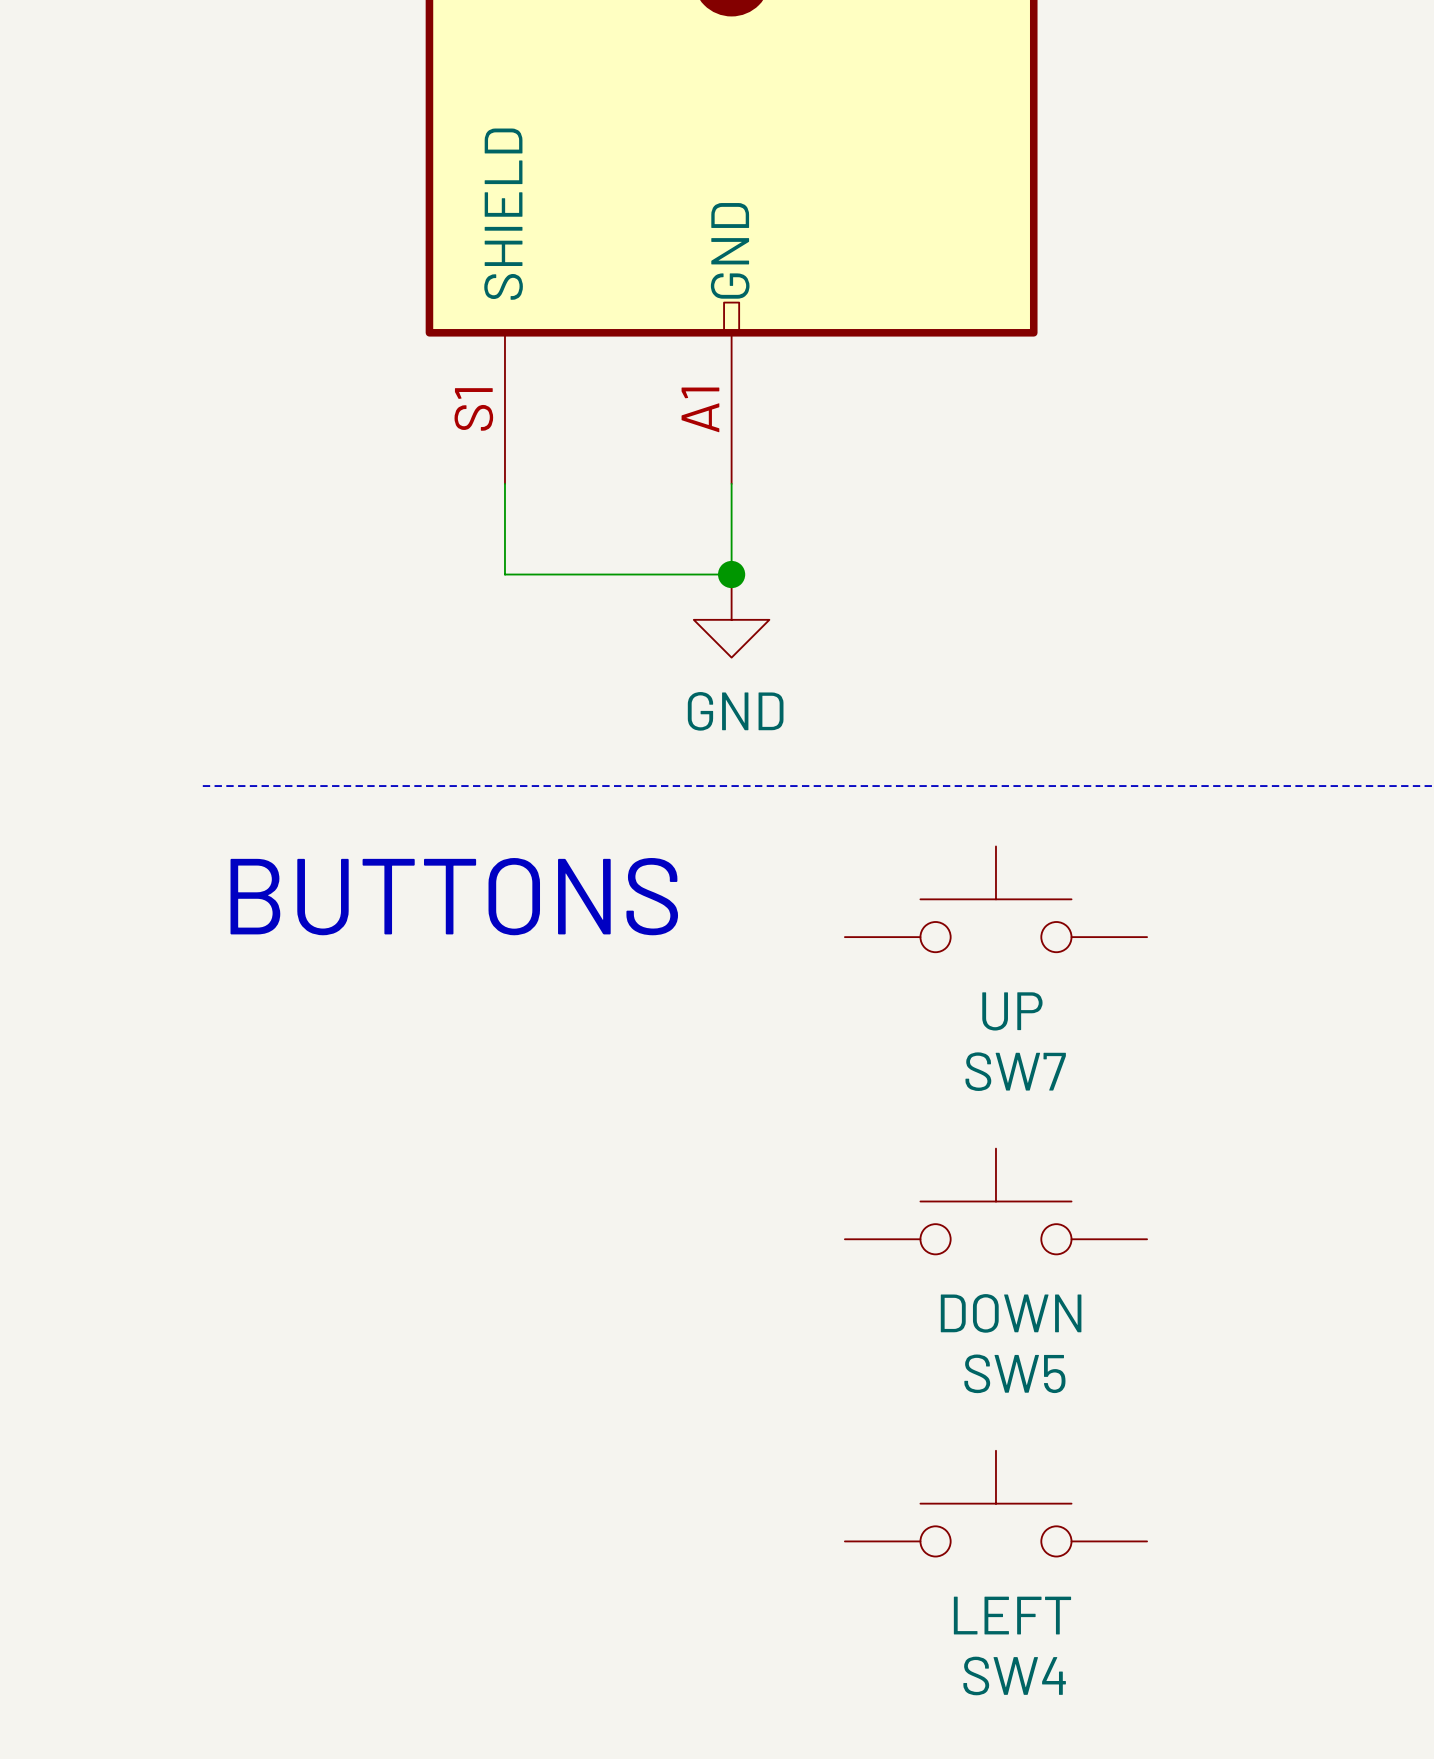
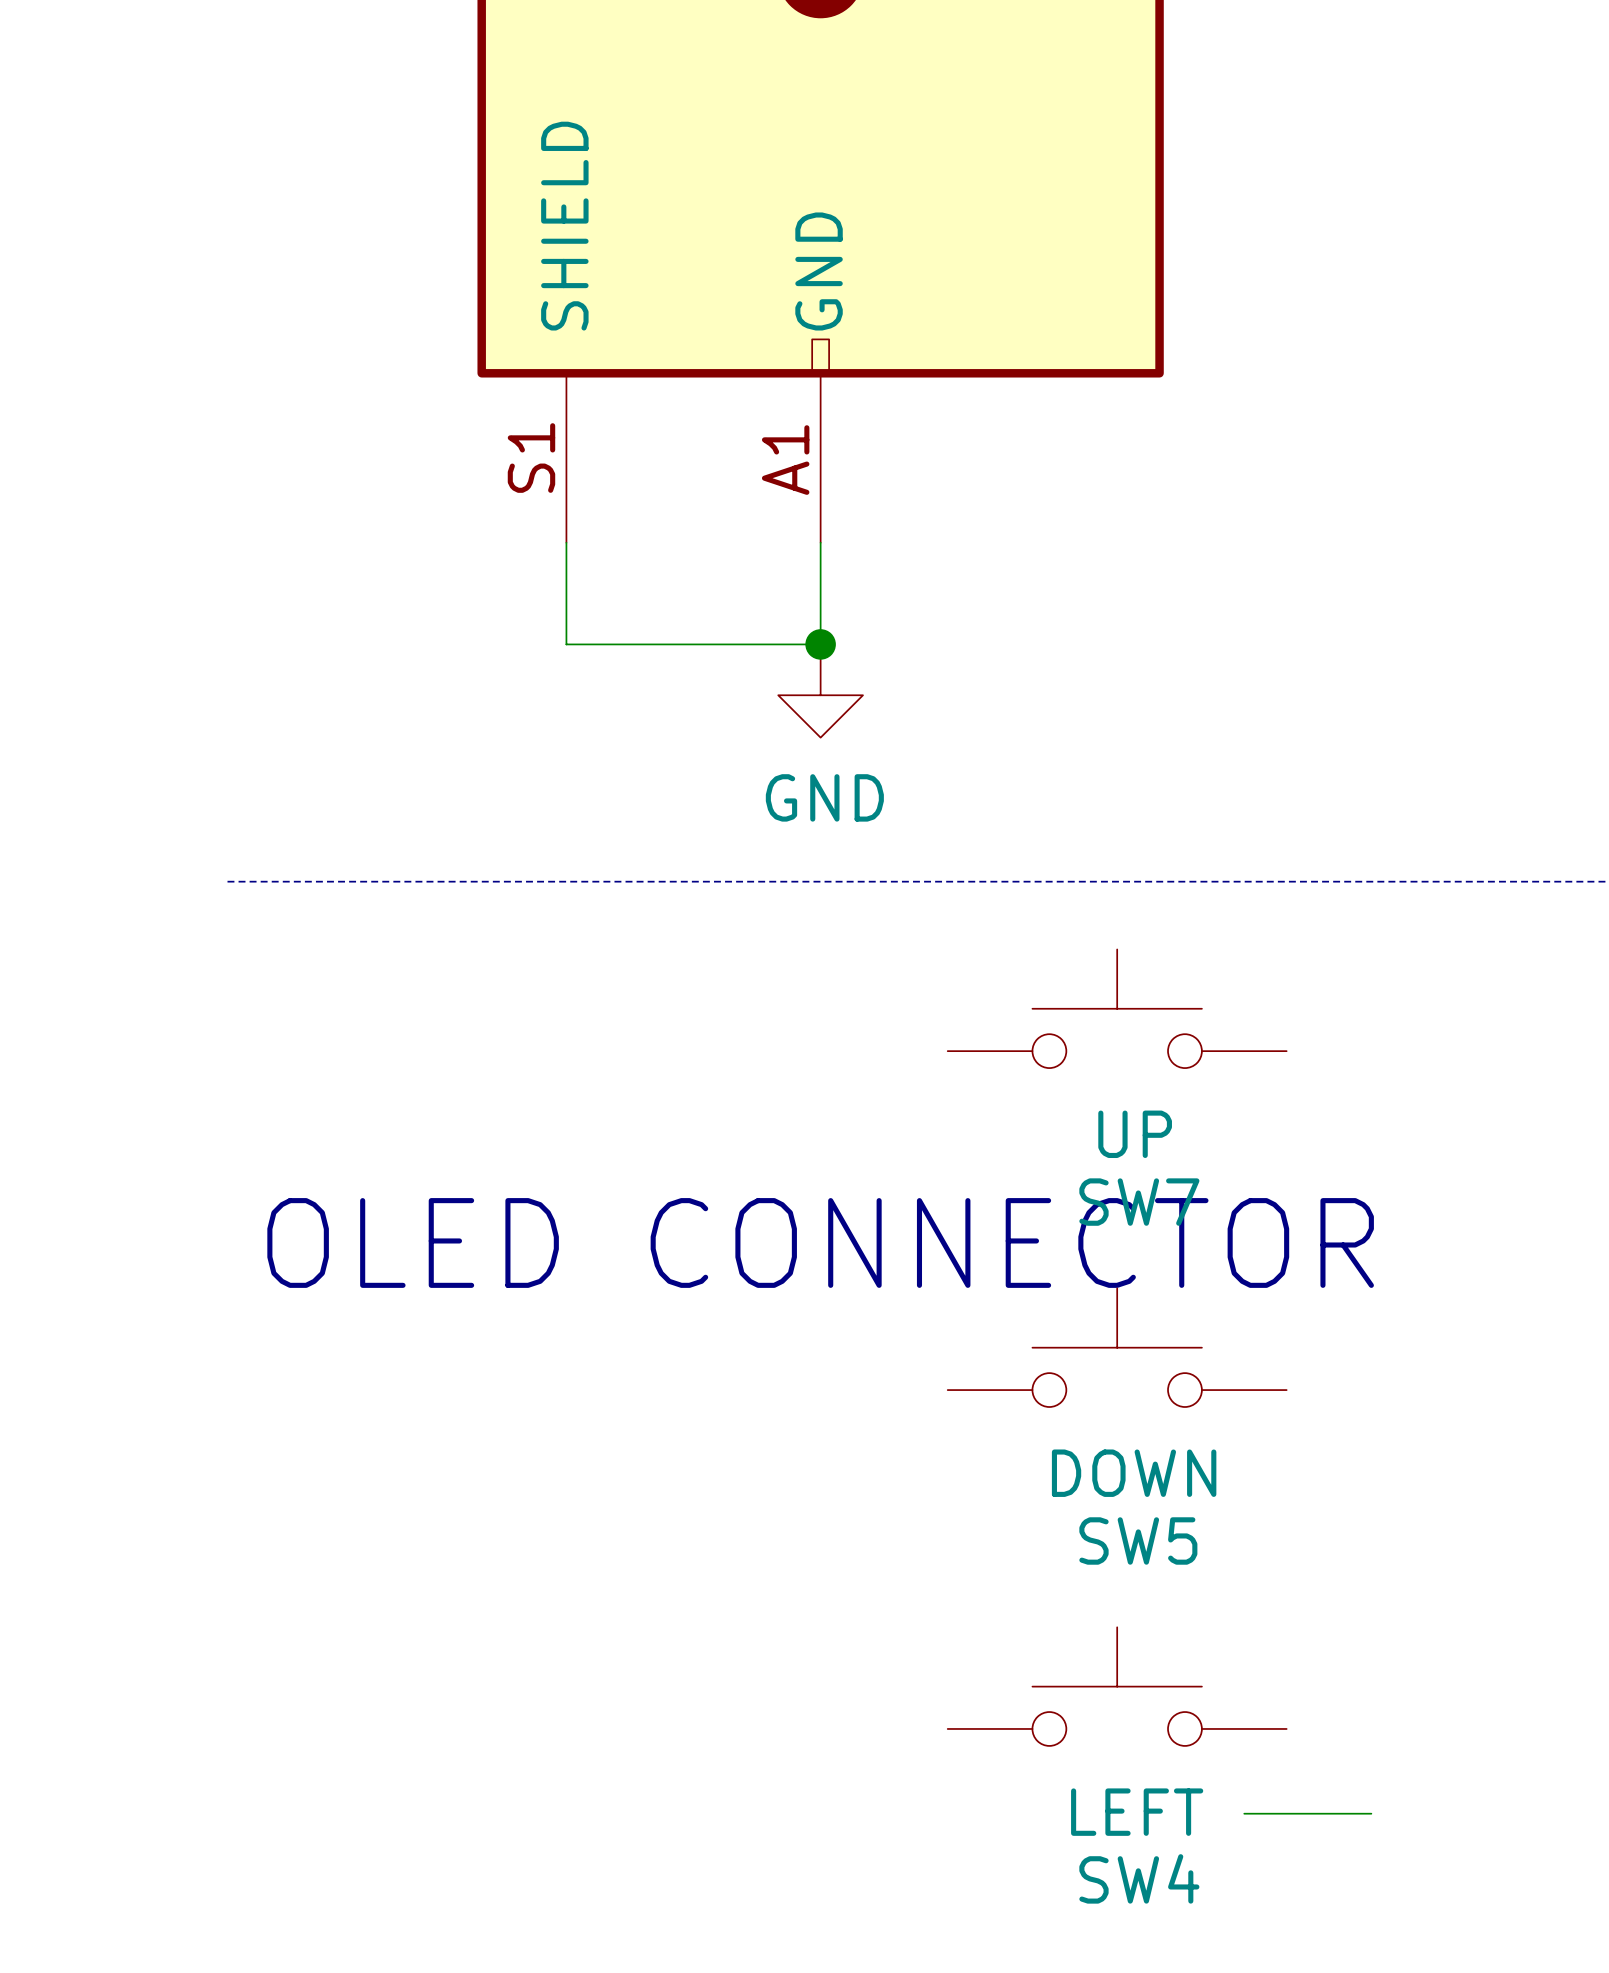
text: BUTTONS (454, 896) -> none
text: none -> OLED CONNECTOR (820, 1242)
wire: none -> (1244, 1813) (1371, 1813)

